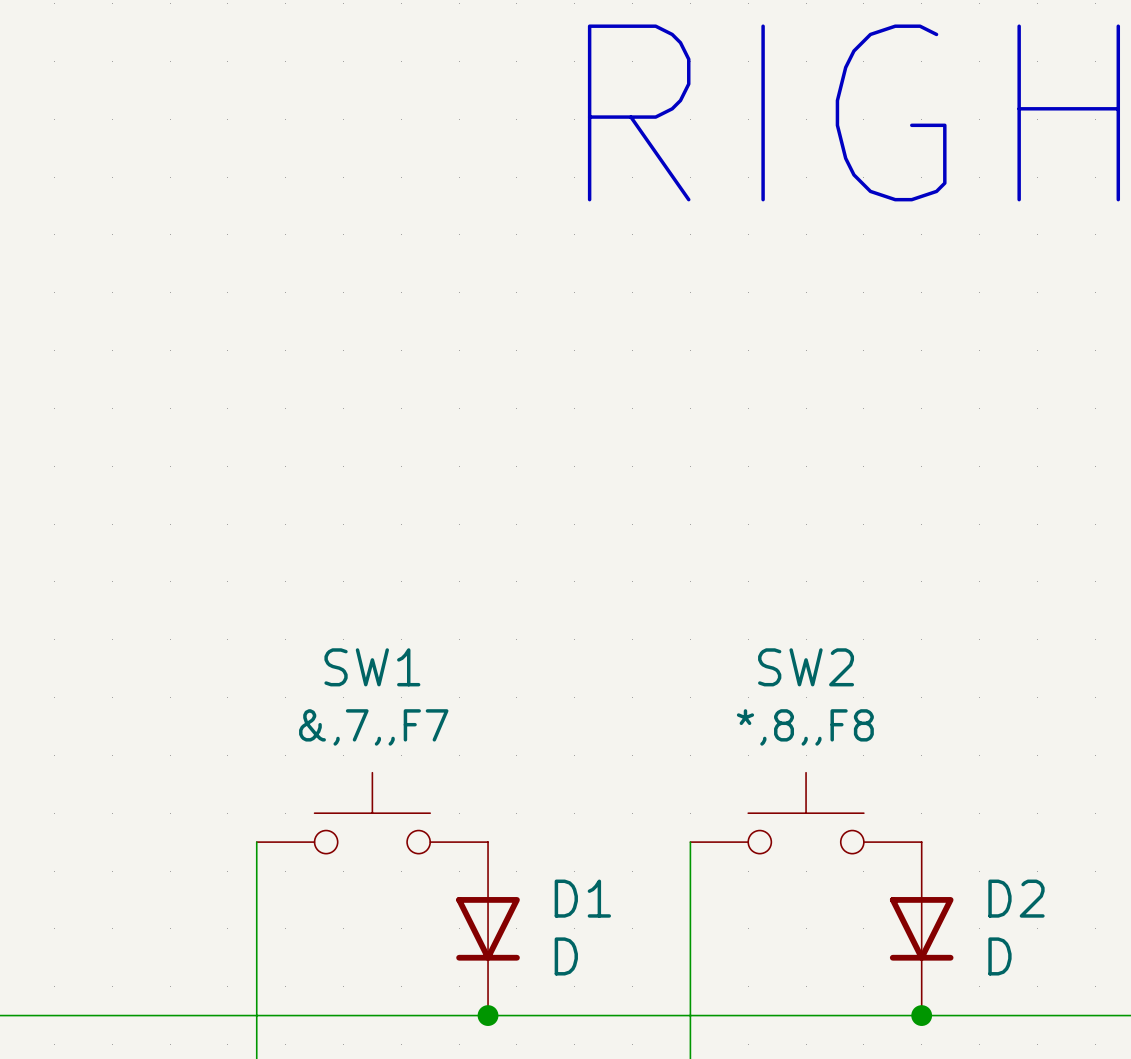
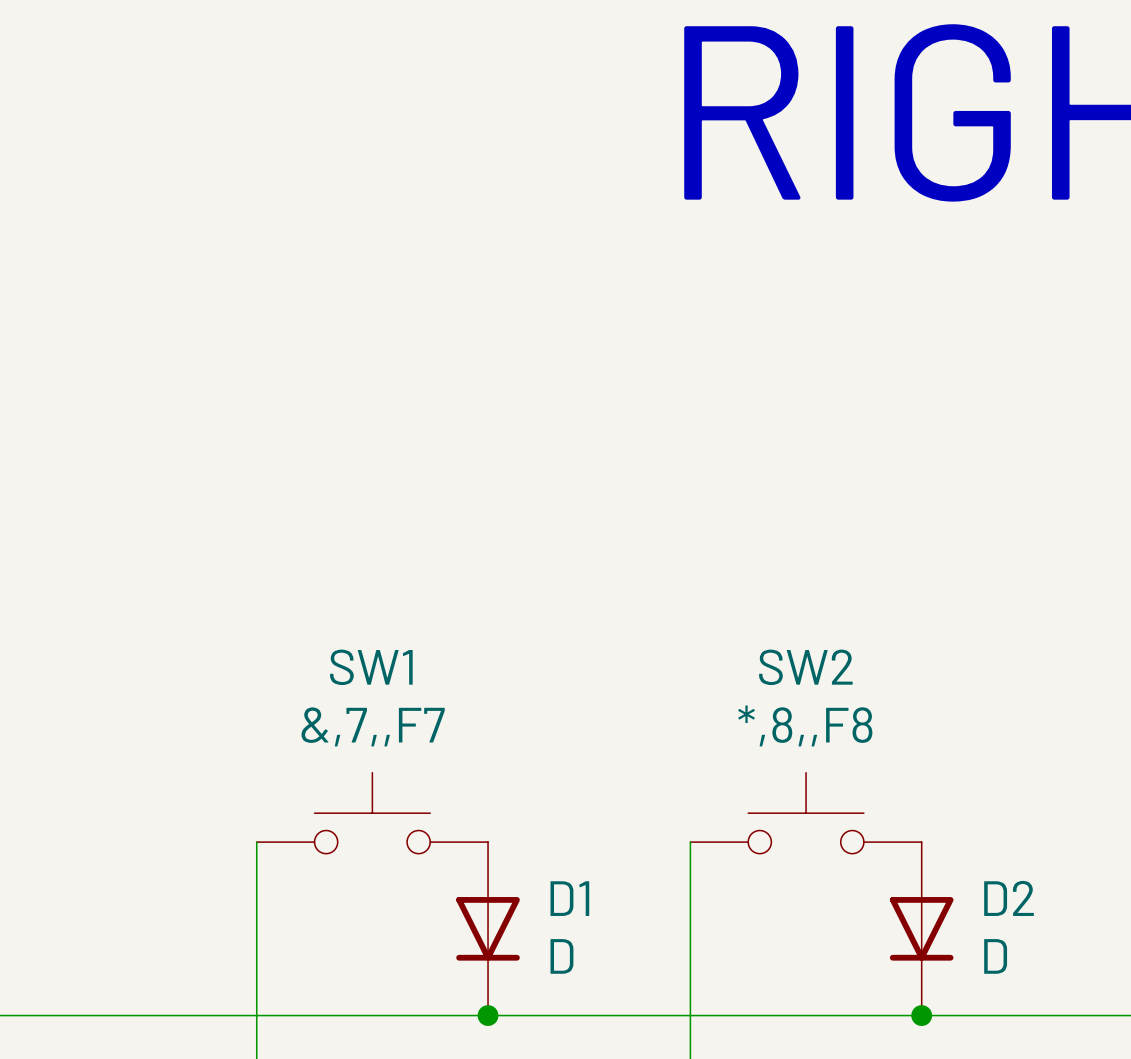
SW1 text: &,7,,F7 (373, 727) -> none
SW1 value: none -> &,7,,F7 (373, 726)
SW2 text: *,8,,F8 (805, 727) -> none
SW2 value: none -> *,8,,F8 (805, 725)

